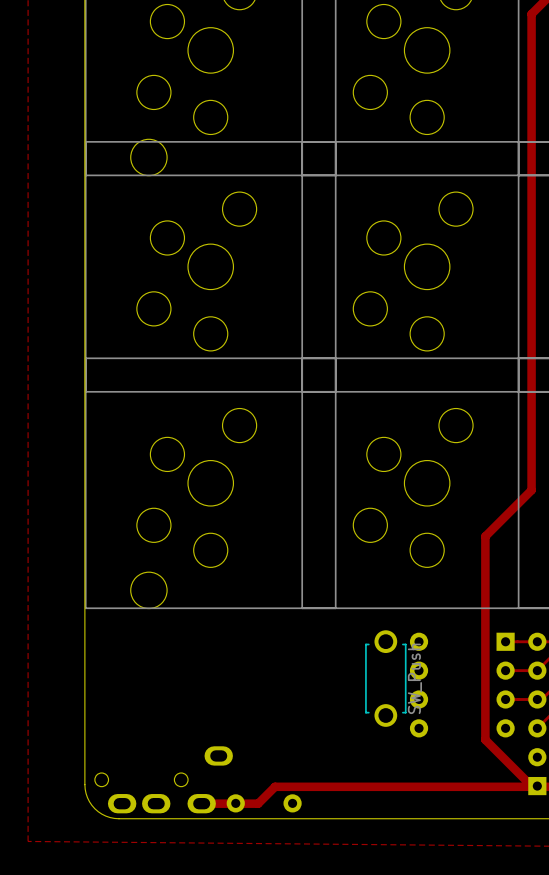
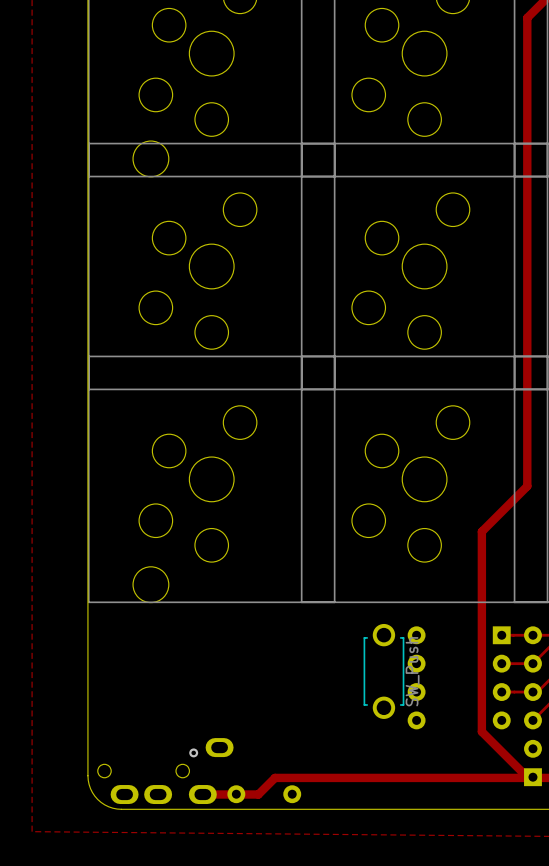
via: none -> (193, 752)

